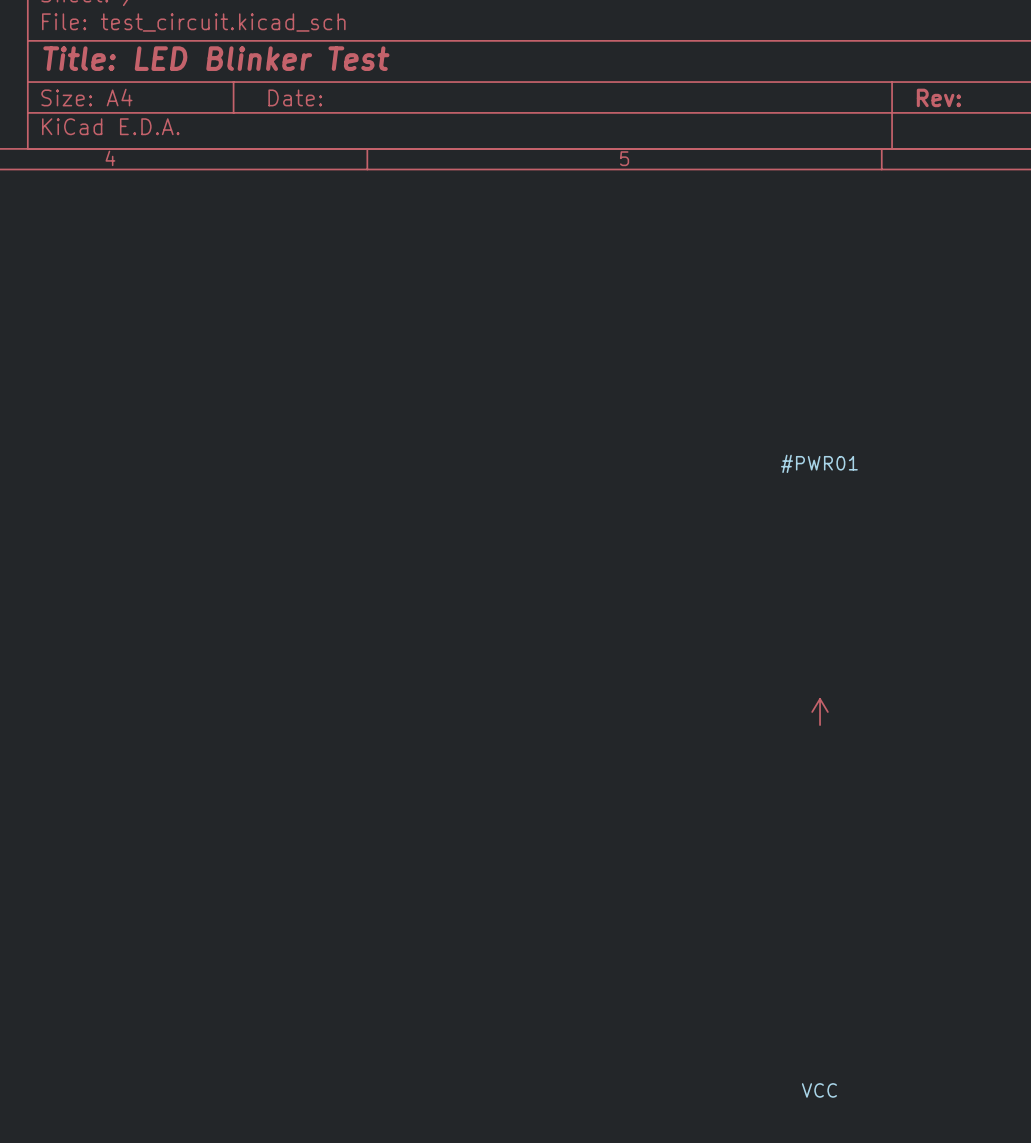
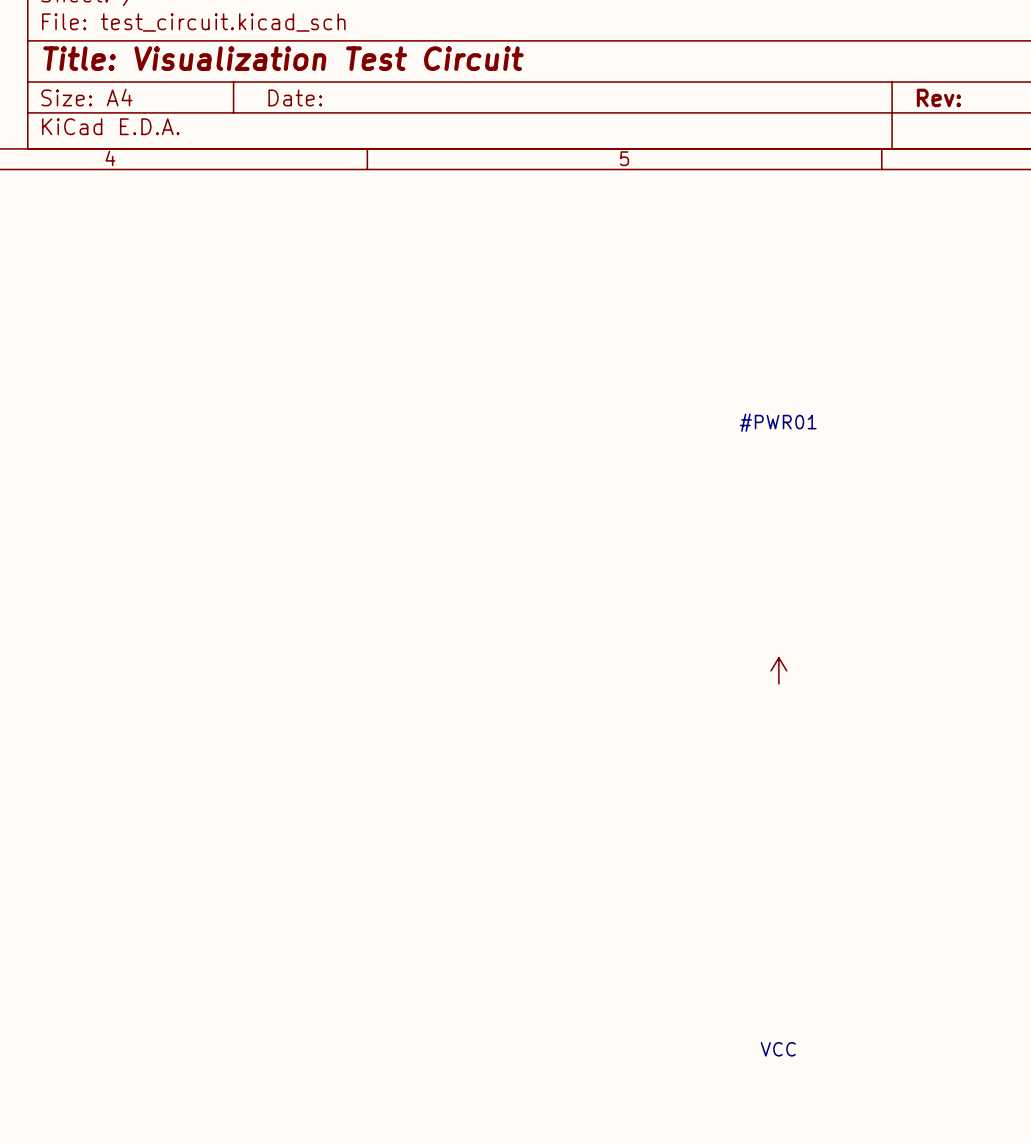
title block: Title: LED Blinker Test (216, 58) -> Title: Visualization Test Circuit (283, 58)
#PWR01 position: VCC (820, 712) -> VCC (778, 670)

